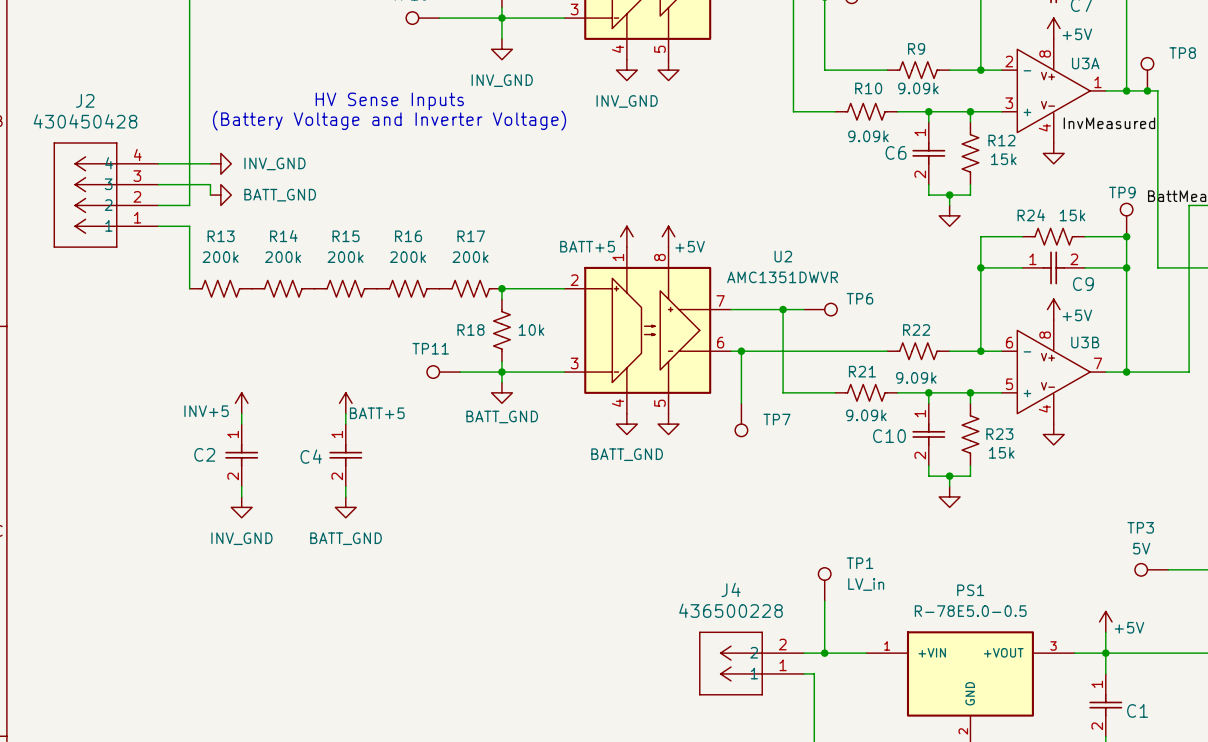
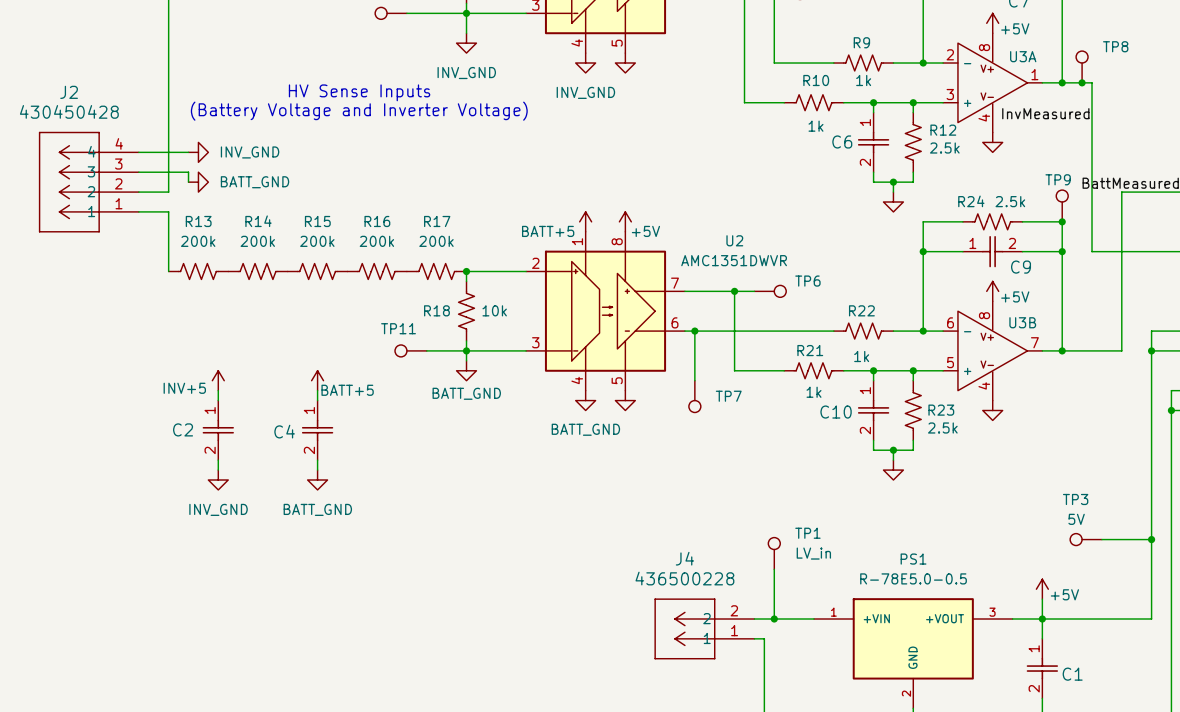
R9 value: 9.09k (918, 88) -> 1k (863, 80)
R10 value: 9.09k (868, 136) -> 1k (815, 126)
R12 value: 15k (1003, 159) -> 2.5k (944, 148)
R24 value: 15k (1072, 215) -> 2.5k (1010, 201)
R22 value: 9.09k (916, 377) -> 1k (861, 356)
R21 value: 9.09k (866, 415) -> 1k (814, 392)
R23 value: 15k (1001, 452) -> 2.5k (942, 428)

